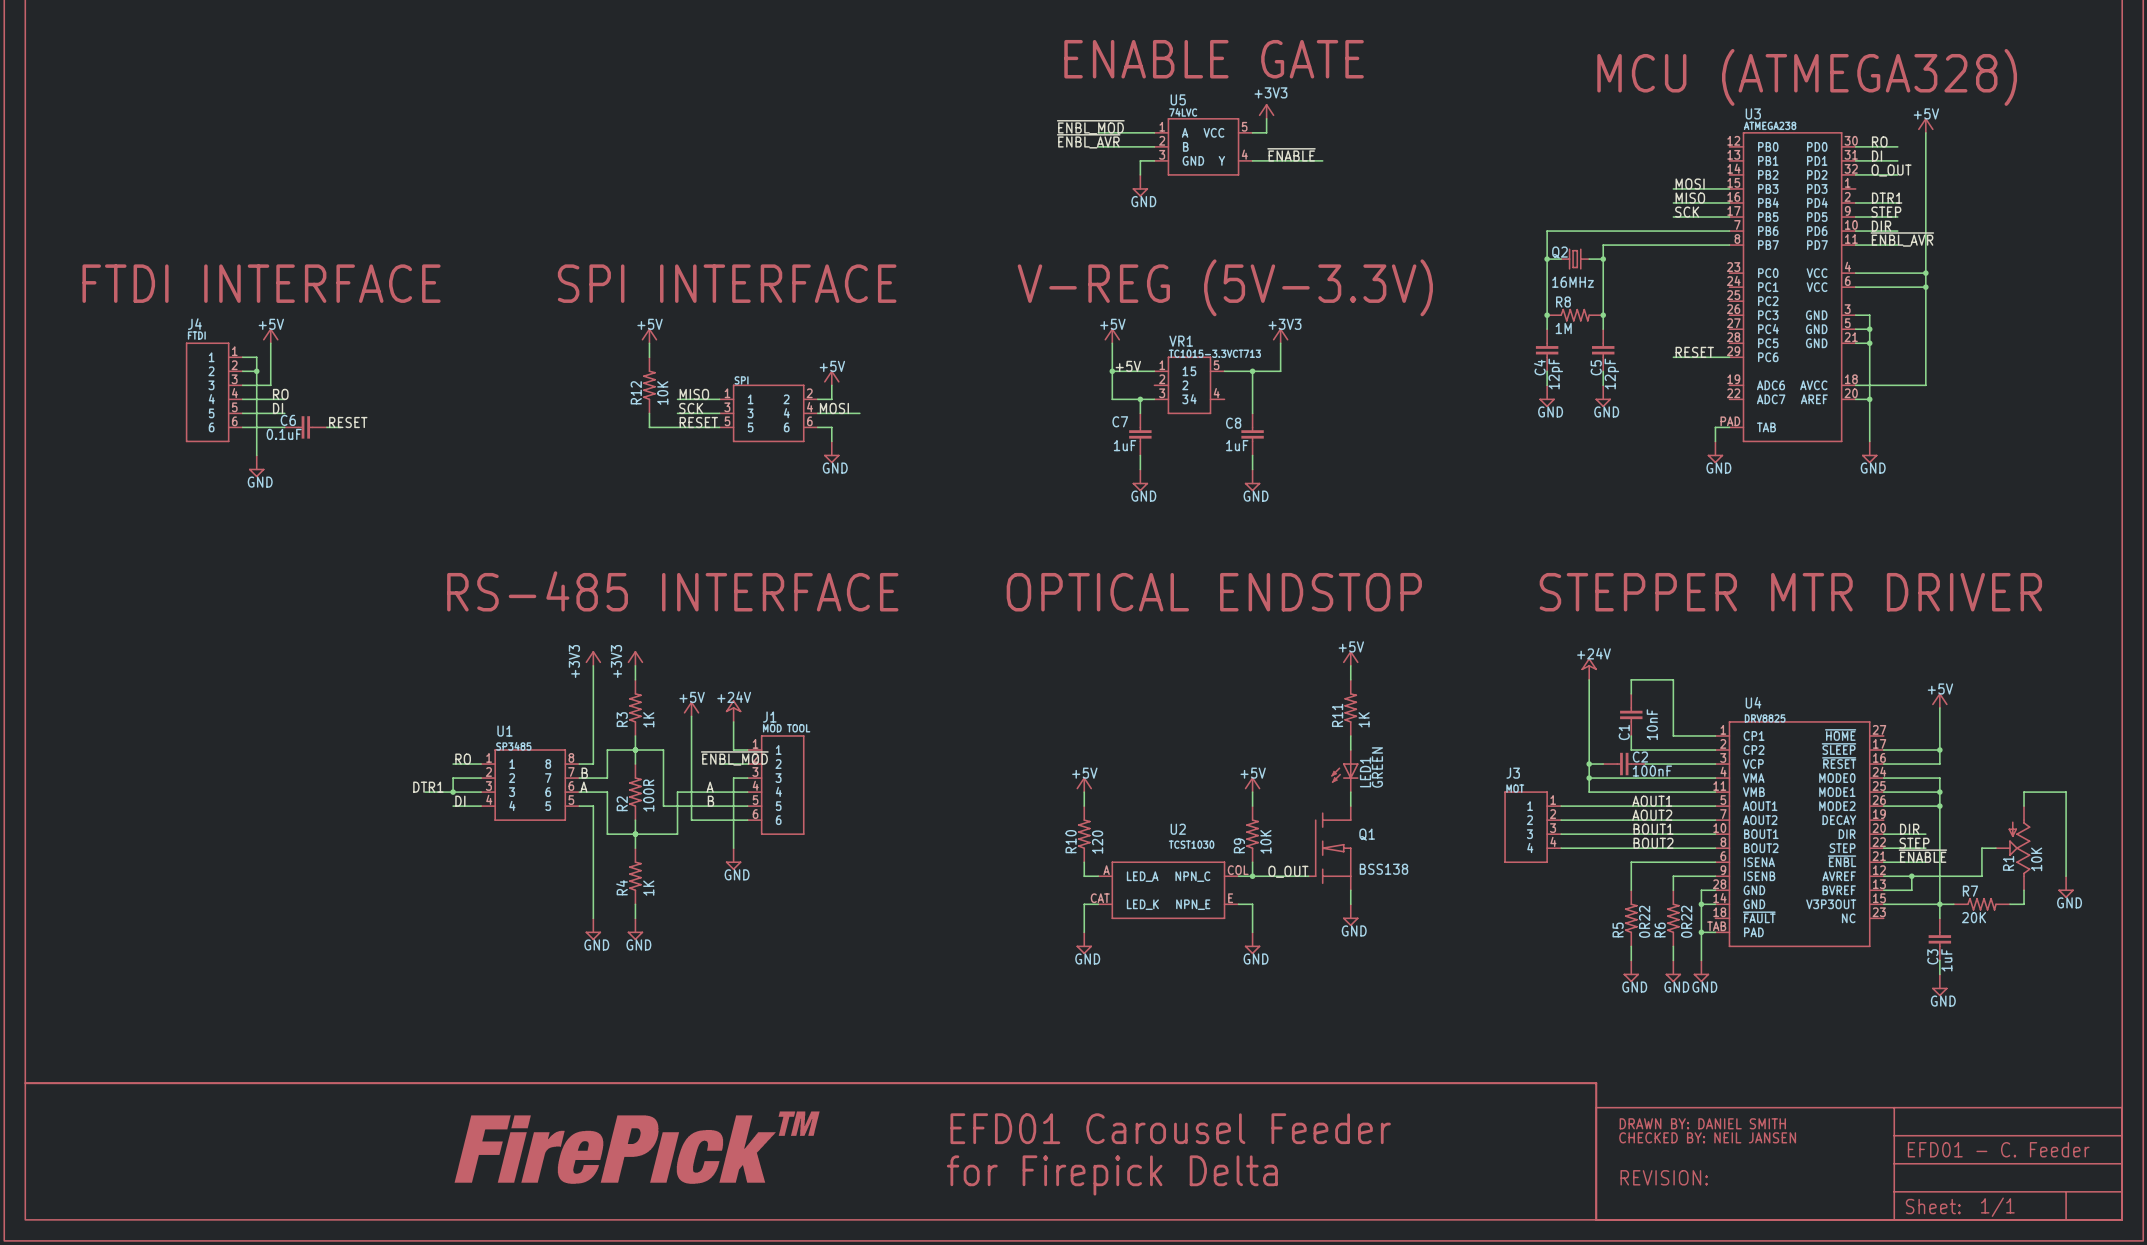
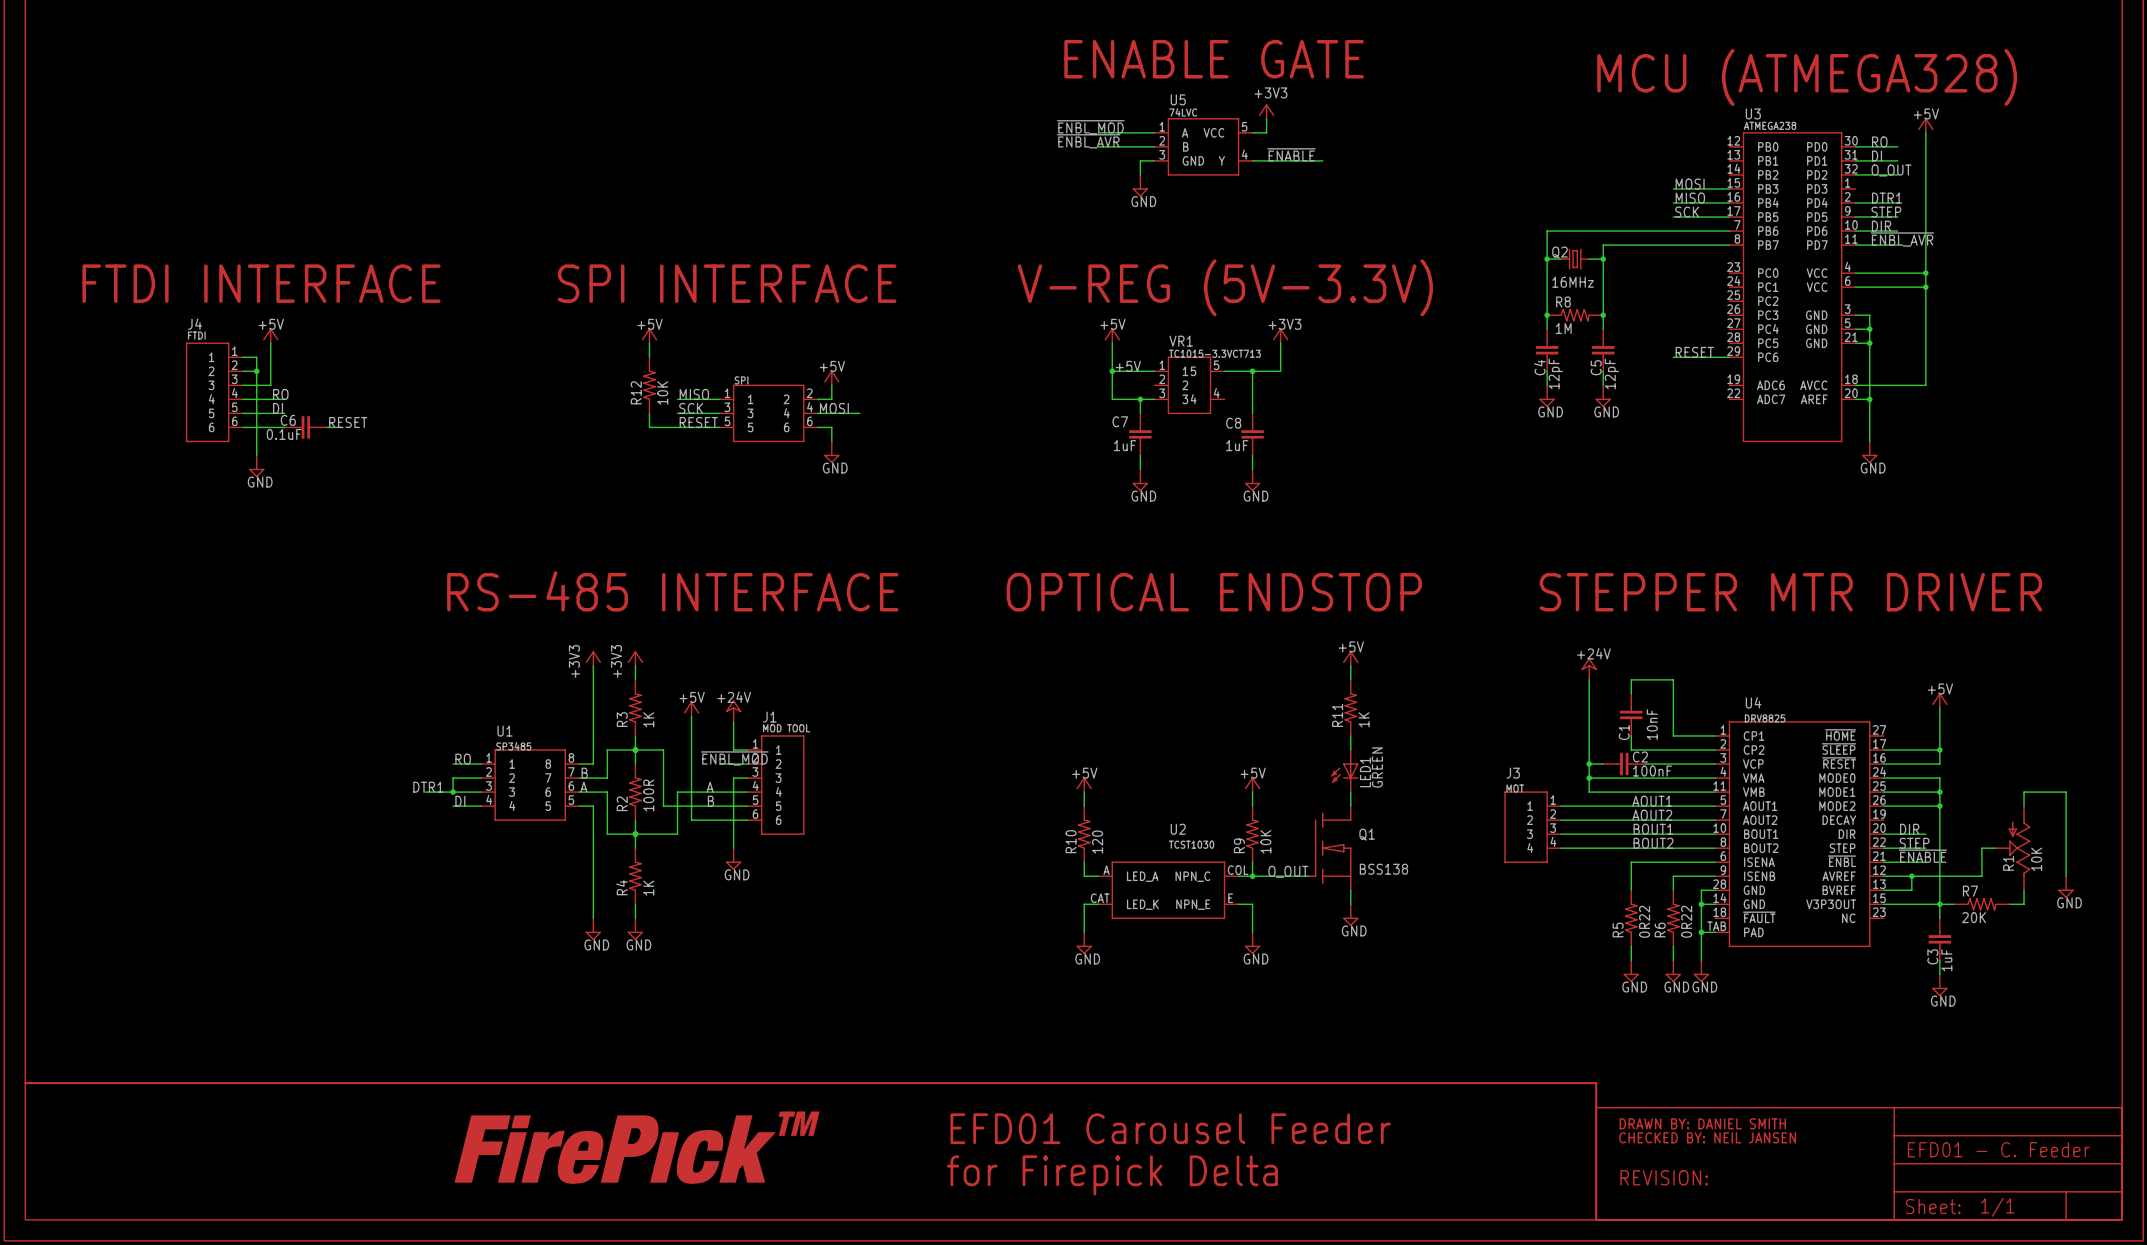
U3 symbol: [1729, 132, 1856, 443] -> [1729, 132, 1856, 443]
wire: (1729, 427) (1715, 427) (1715, 441) -> none
power symbol: GND (1715, 452) -> none

